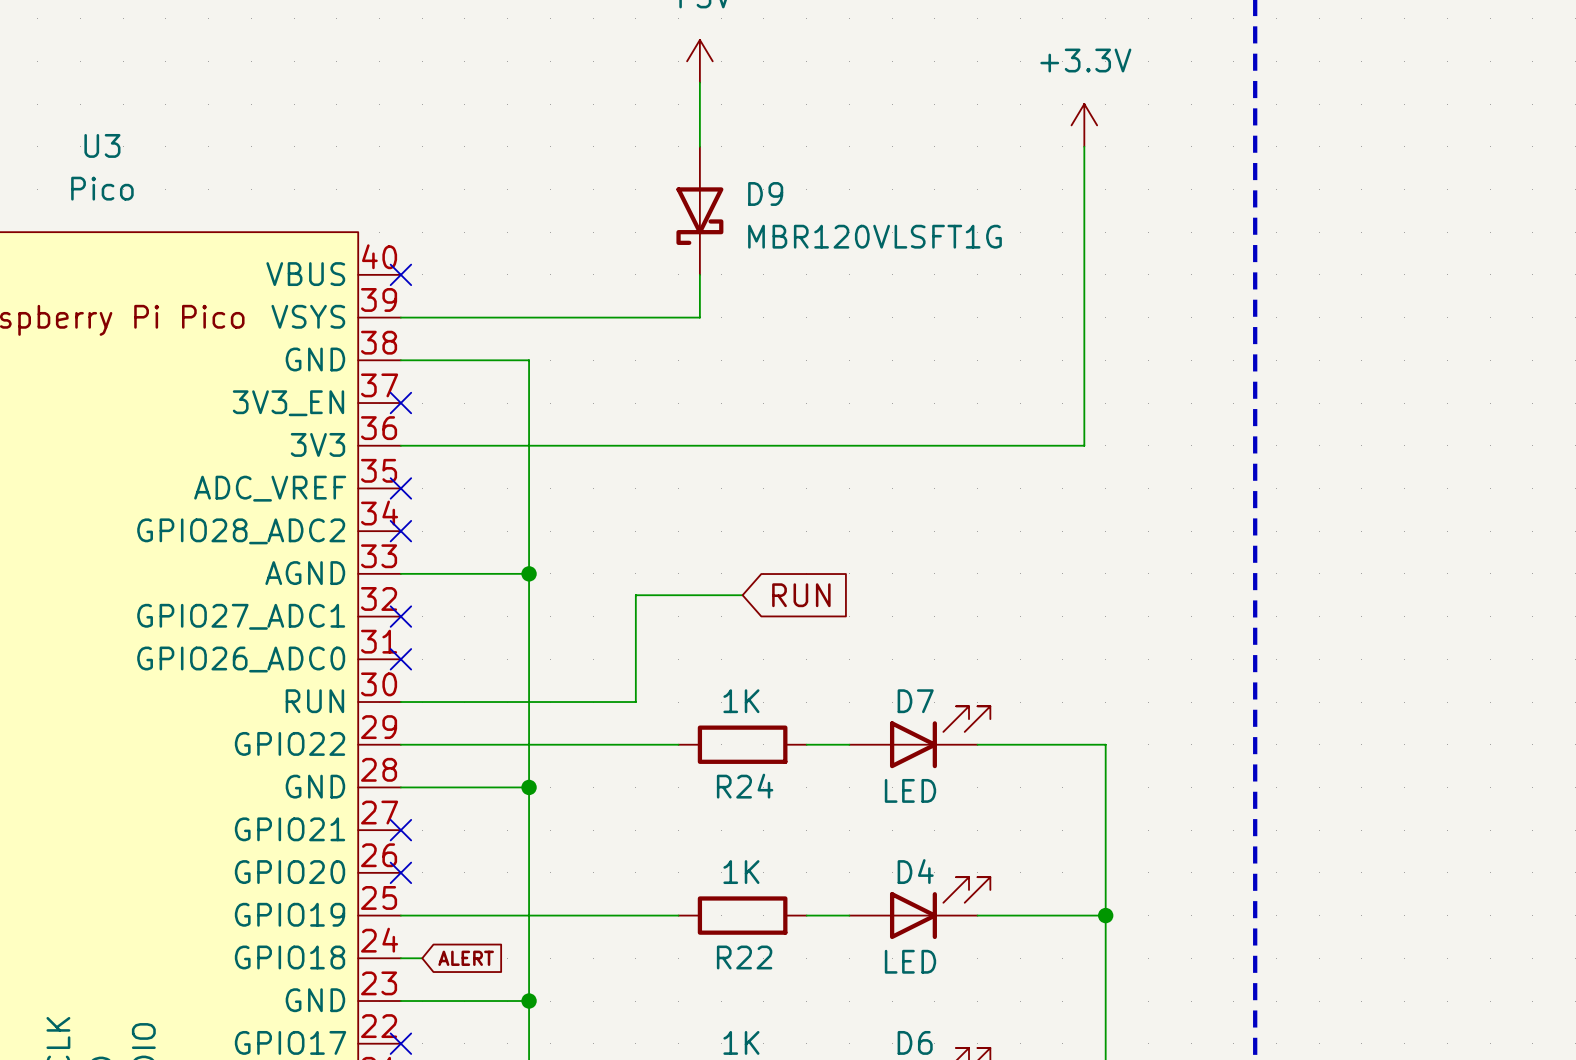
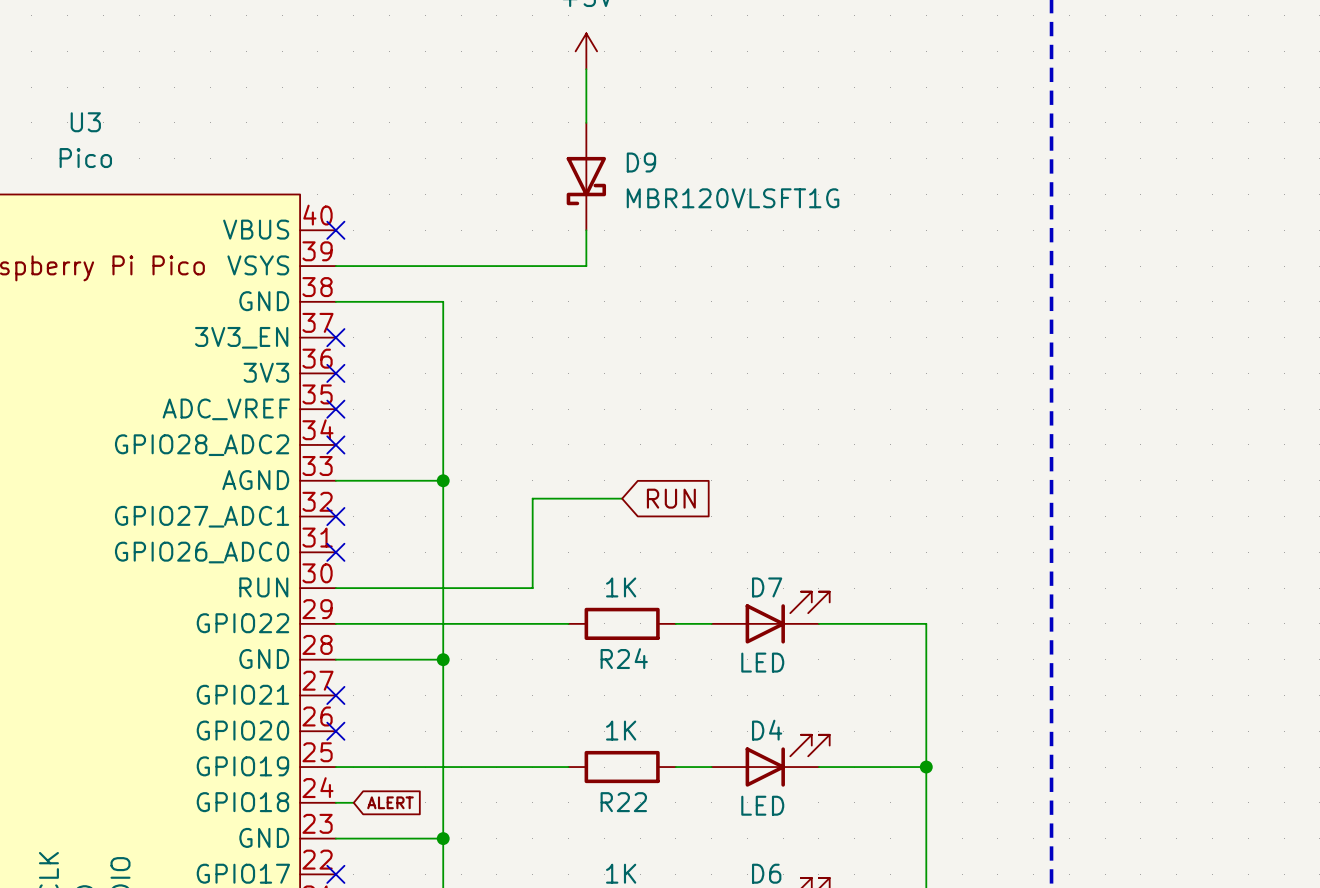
power symbol: +3.3V (1084, 125) -> none
wire: (1084, 146) (1084, 445) (400, 445) -> none
no-connect mark: none -> (335, 373)

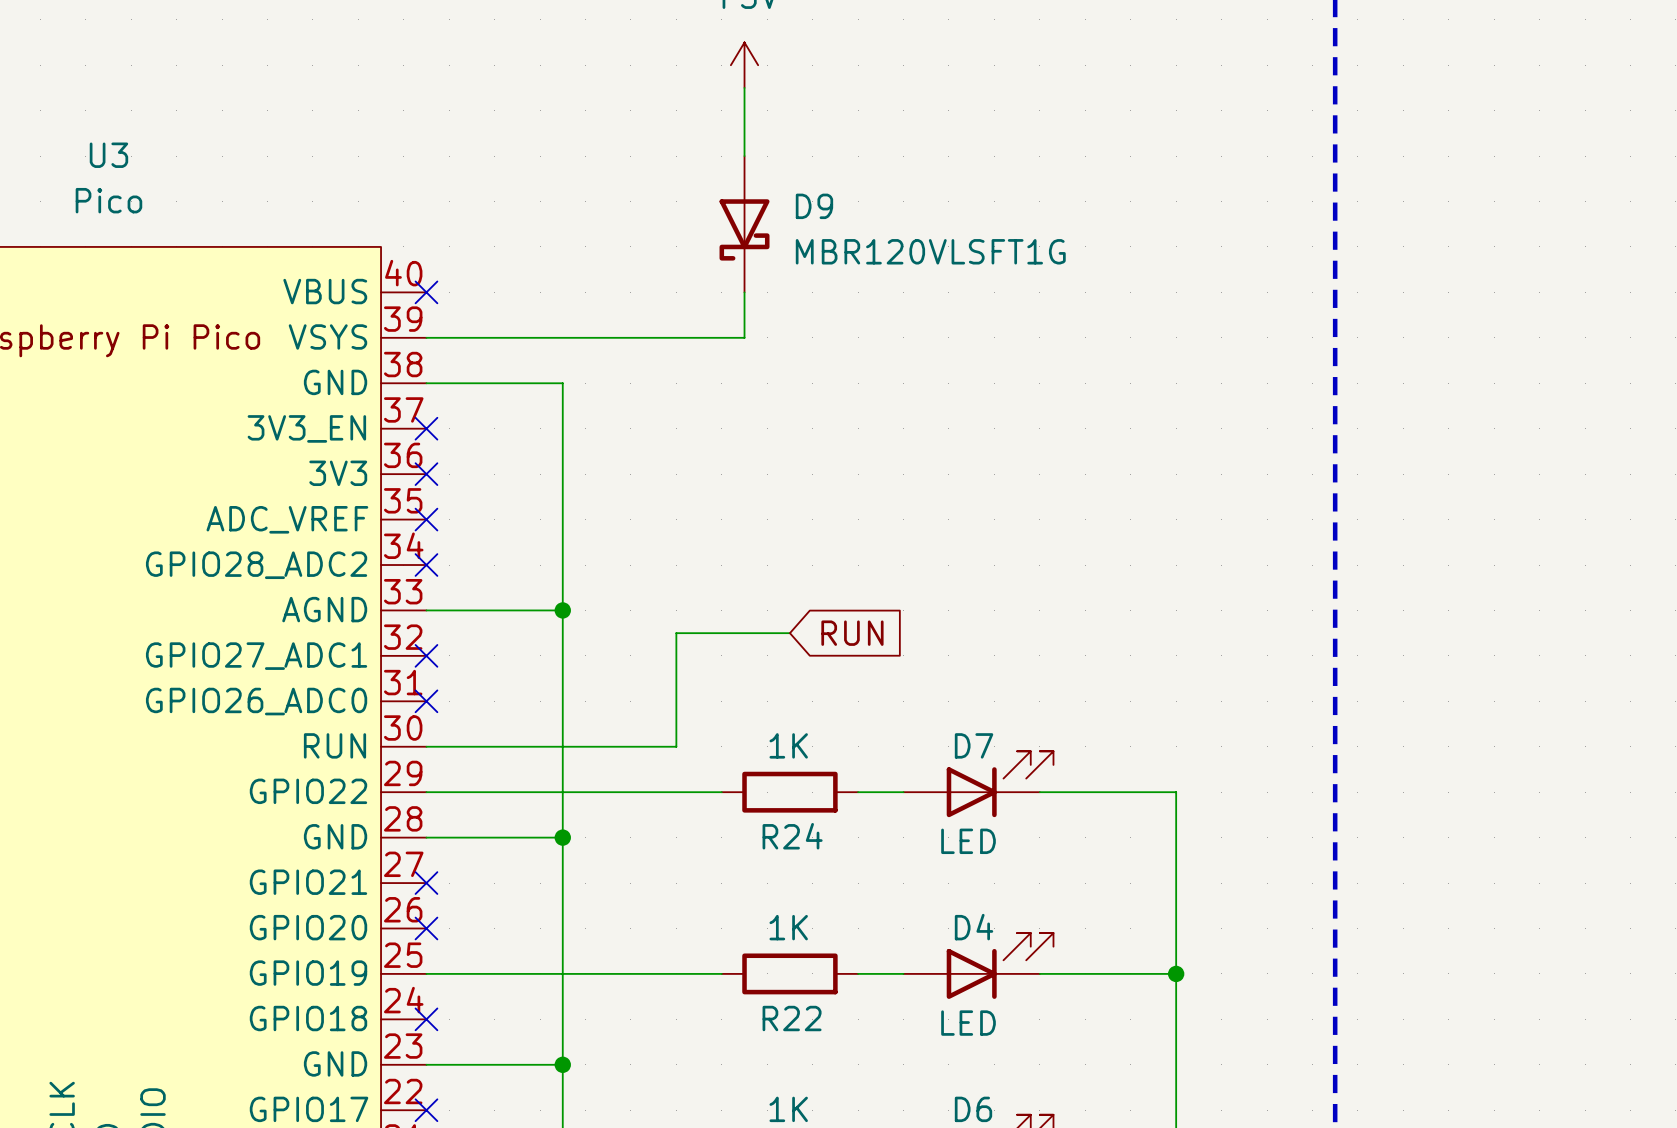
wire: (335, 802) (353, 802) -> none
no-connect mark: none -> (426, 1019)
global label: ALERT (390, 802) -> none

